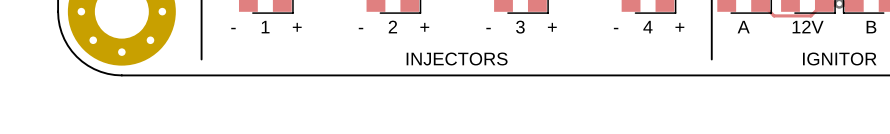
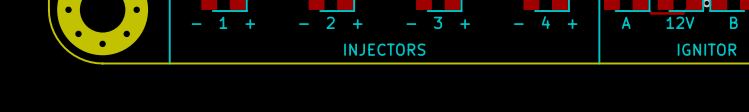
line: none -> (169, 50) (169, 63)
line: none -> (599, 50) (599, 63)

